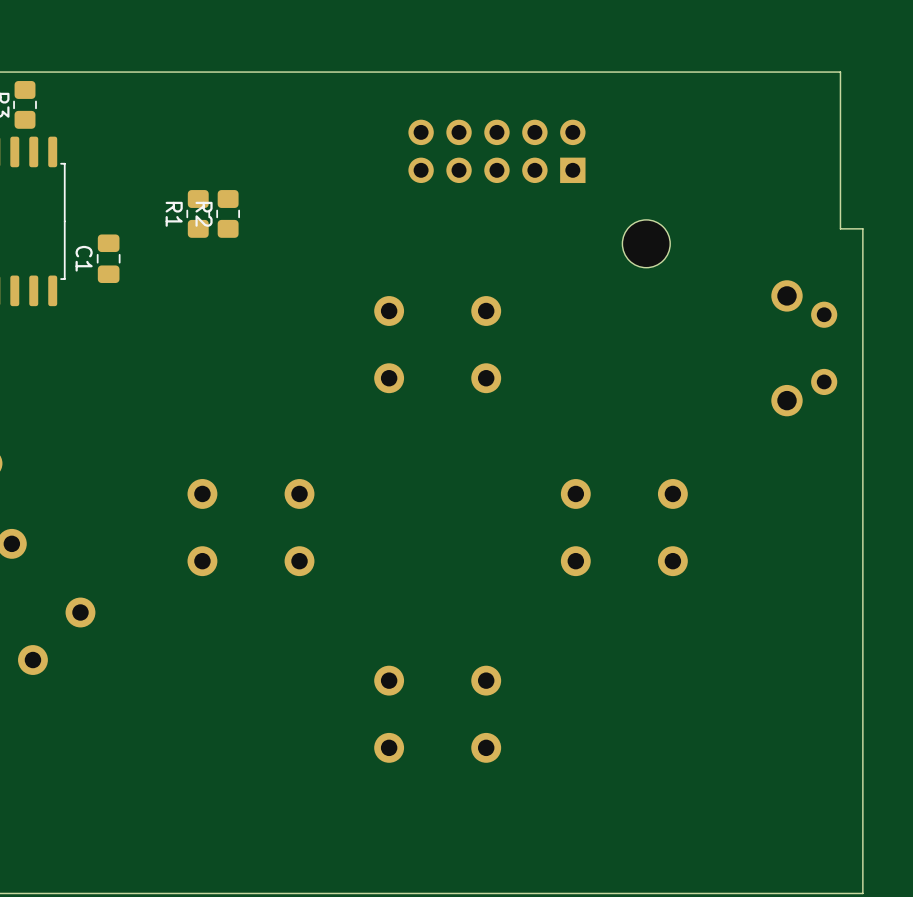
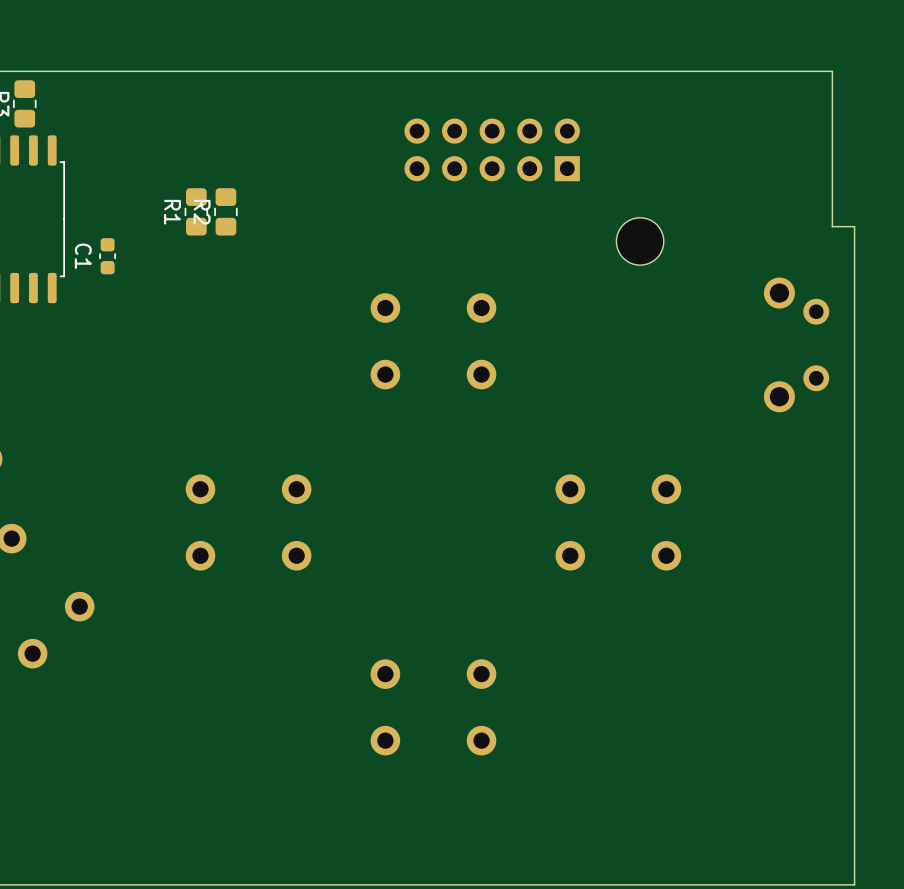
C1 footprint: [96, 234, 121, 284] -> [99, 238, 117, 275]

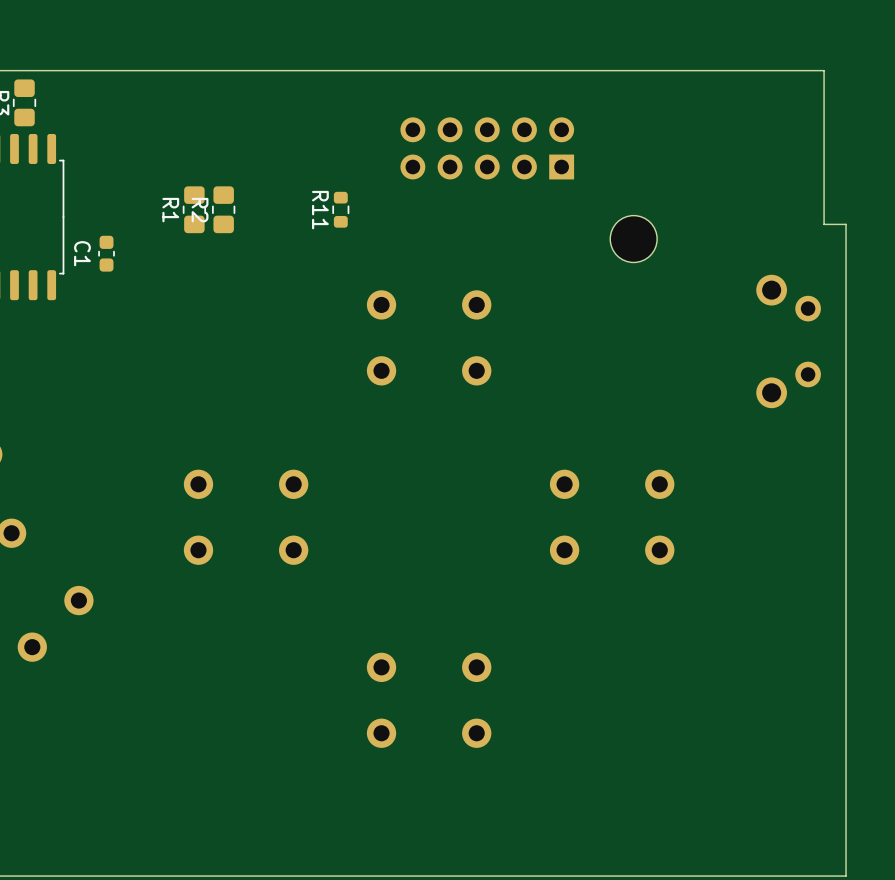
R11: none -> (340, 209)

